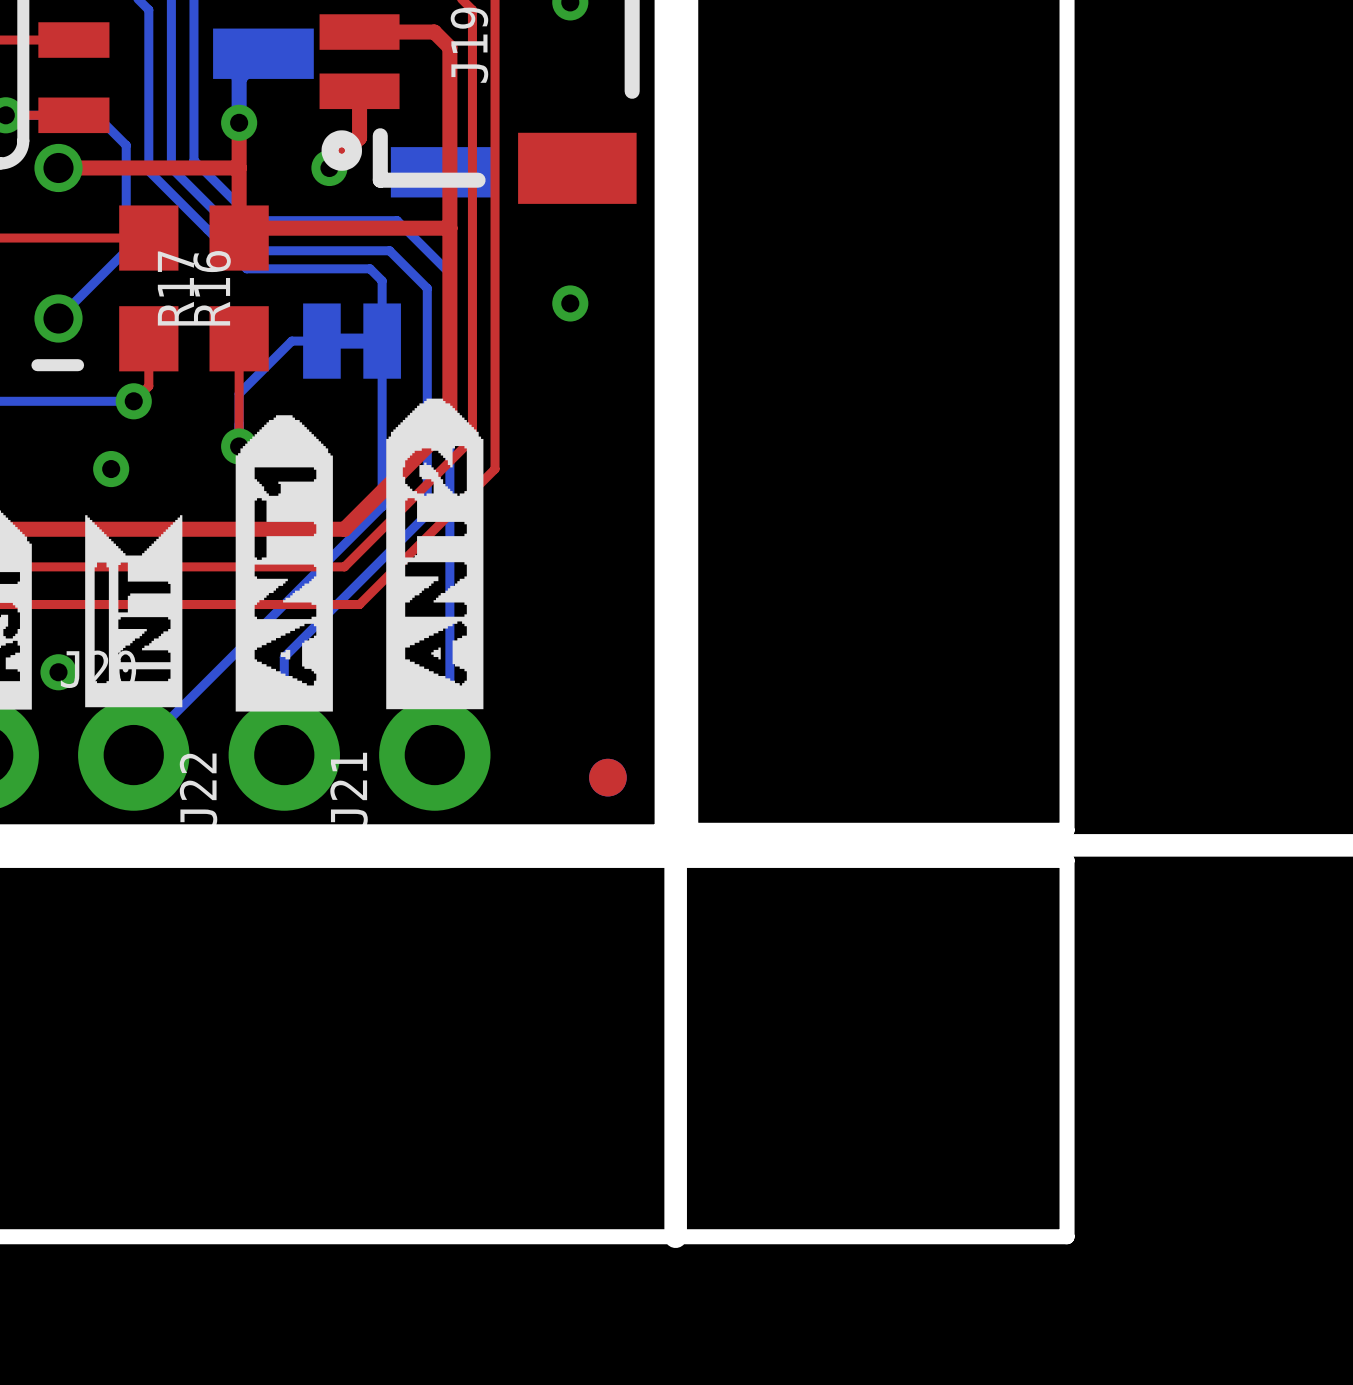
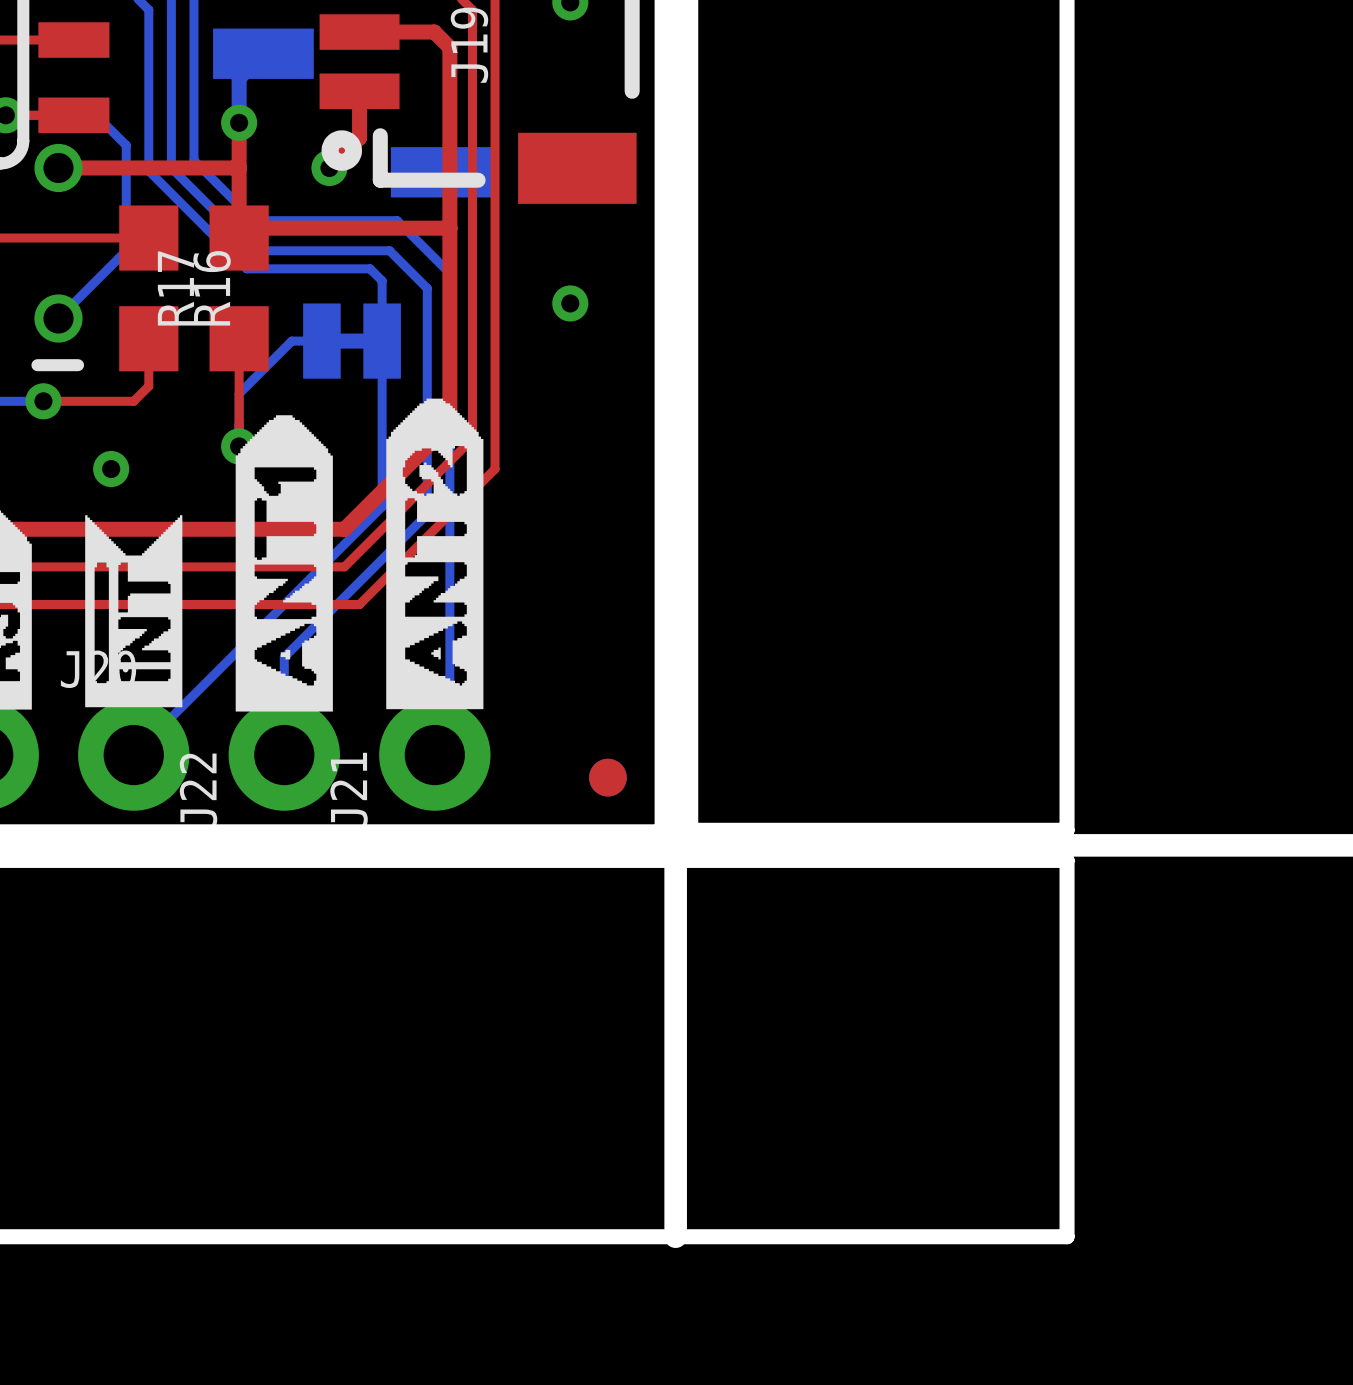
bottom track: (43, 401) (133, 401) -> none
top track: none -> (43, 401) (133, 401)
via: none -> (43, 401)
via: (133, 401) -> none
via: (58, 672) -> none

